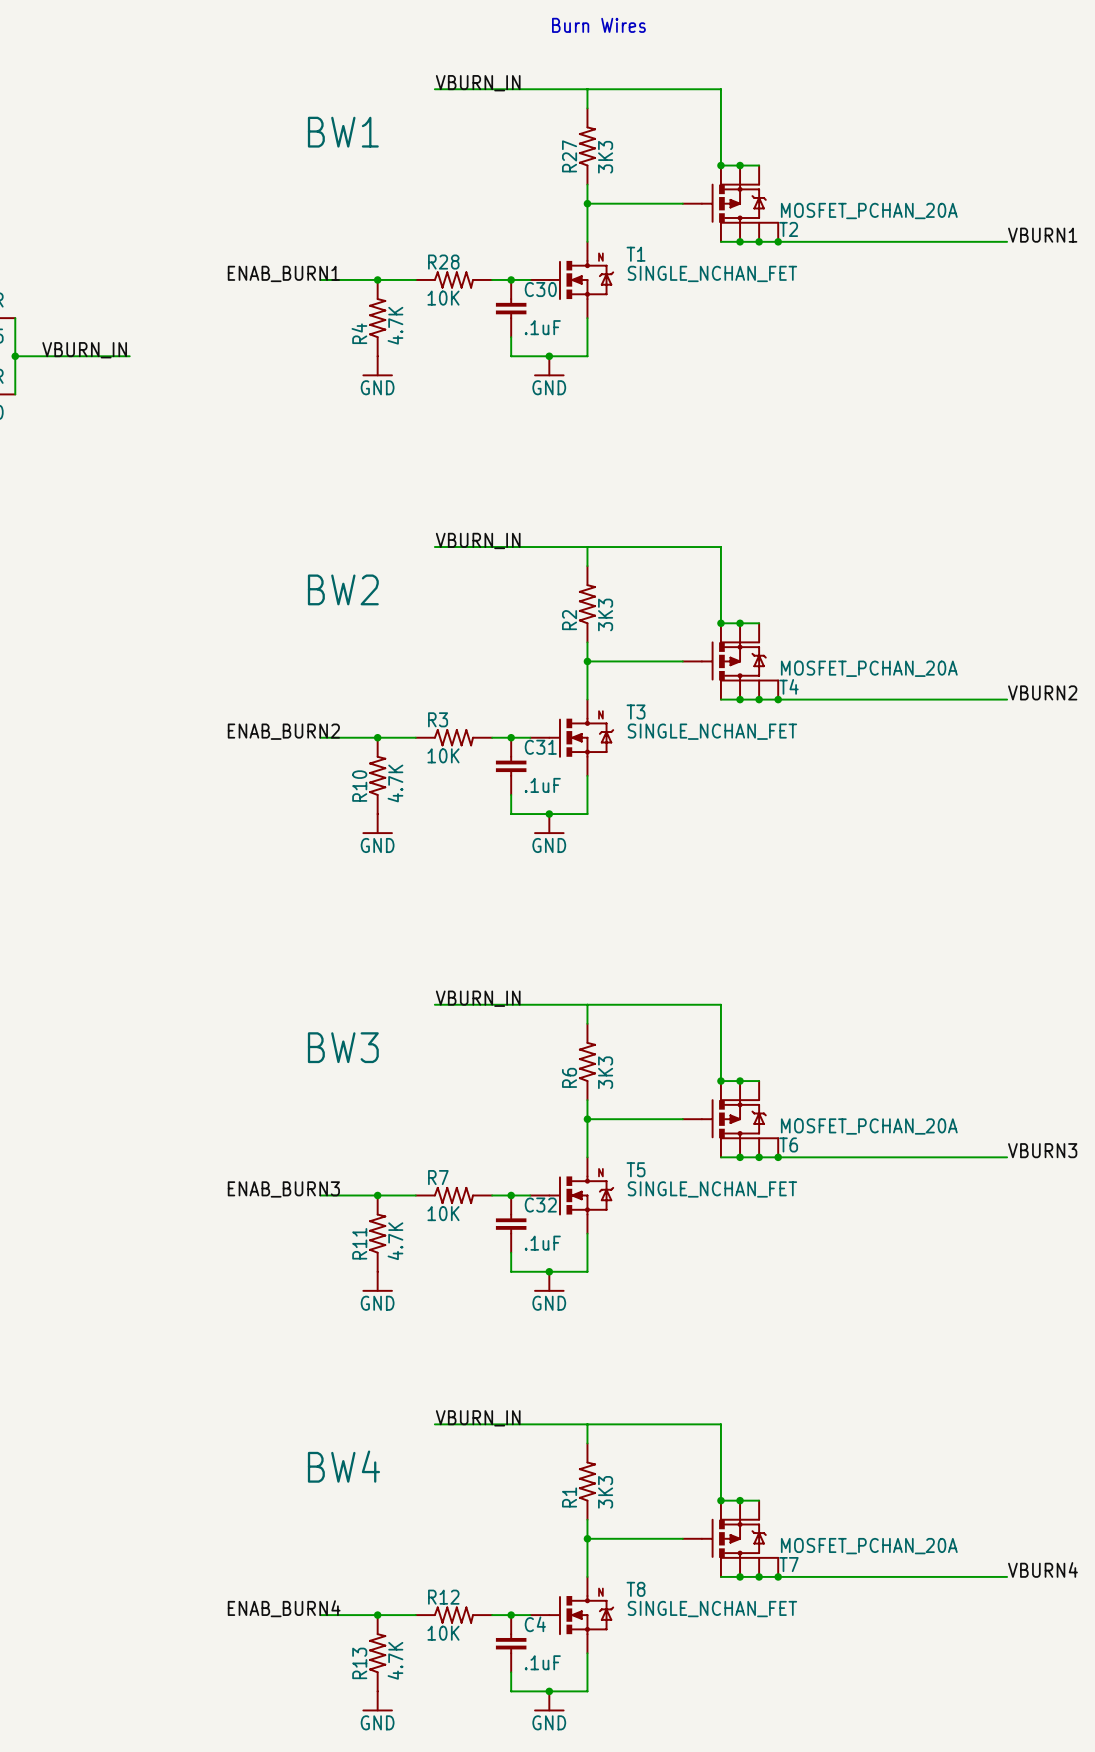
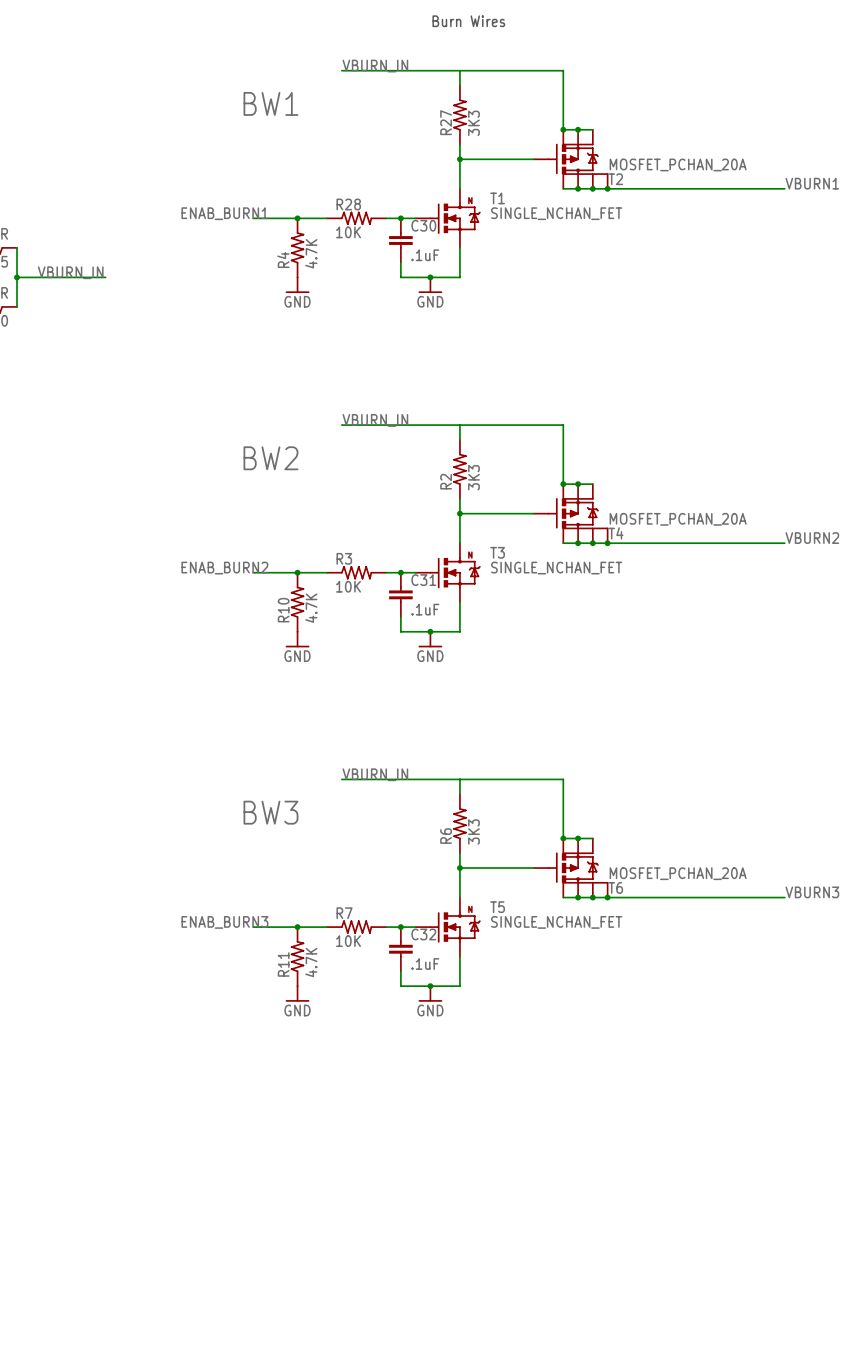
label: VBURN_IN (478, 1418) -> none
wire: (434, 1424) (720, 1424) (720, 1500) (759, 1500) -> none
wire: (587, 1424) (587, 1443) -> none
text: BW4 (343, 1466) -> none
R1: 3K3 (587, 1481) -> none
junction: (720, 1500) -> none
junction: (740, 1500) -> none
wire: (587, 1519) (587, 1576) -> none
wire: (587, 1538) (682, 1538) -> none
junction: (587, 1538) -> none
T7: MOSFET_PCHAN_20A (730, 1538) -> none
label: VBURN4 (1042, 1569) -> none
wire: (720, 1576) (1007, 1576) -> none
junction: (740, 1576) -> none
junction: (759, 1576) -> none
junction: (778, 1576) -> none
label: ENAB_BURN4 (284, 1608) -> none
wire: (320, 1615) (415, 1615) -> none
junction: (377, 1615) -> none
R12: 10K (453, 1615) -> none
wire: (492, 1615) (530, 1615) -> none
junction: (511, 1615) -> none
T8: SINGLE_NCHAN_FET (572, 1615) -> none
C4: .1uF (511, 1643) -> none
R13: 4.7K (377, 1653) -> none
wire: (587, 1653) (587, 1691) (511, 1691) (511, 1672) -> none
junction: (549, 1691) -> none
power symbol: GND (377, 1701) -> none
power symbol: GND (549, 1701) -> none

